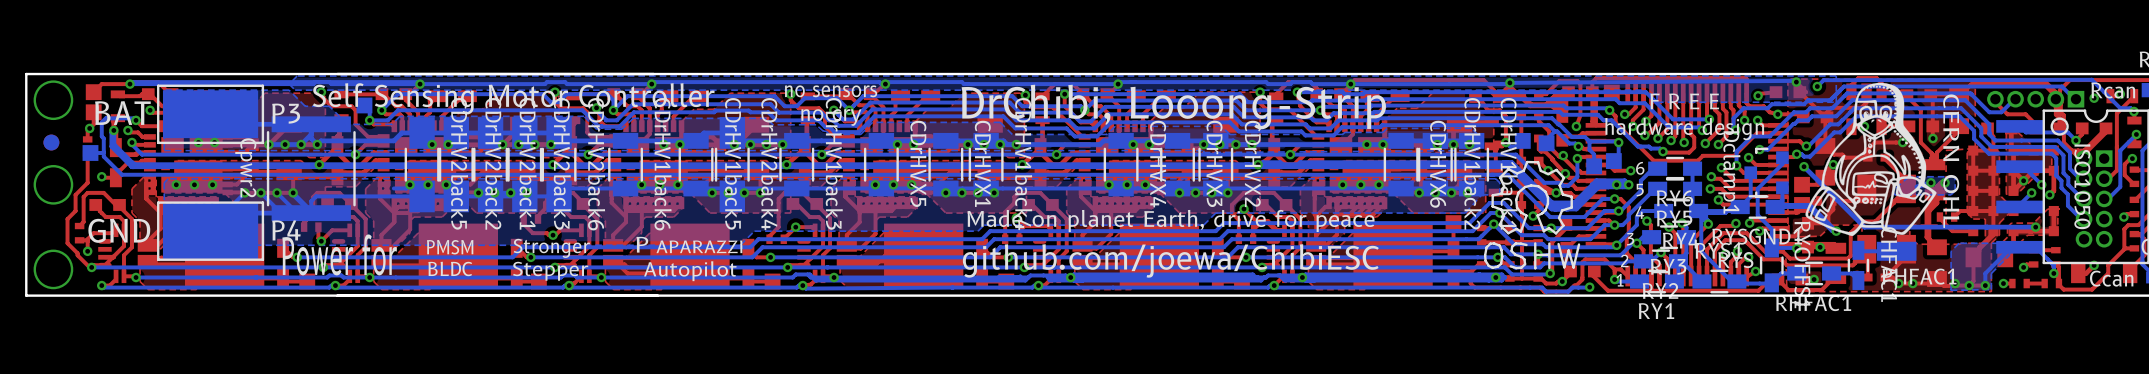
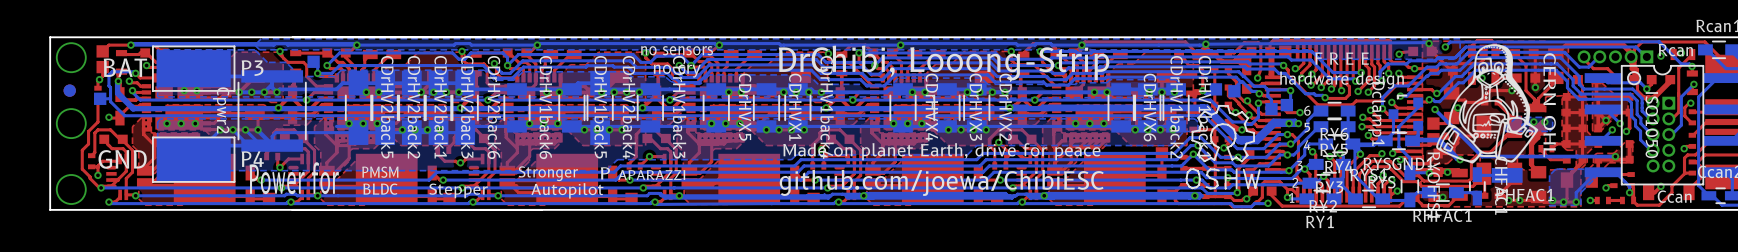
text: Self Sensing Motor Controller (513, 98) -> none
text position: P (642, 244) -> P (605, 173)
text position: APARAZZI (699, 246) -> APARAZZI (651, 175)
text position: Stronger (551, 248) -> Stronger (548, 173)

